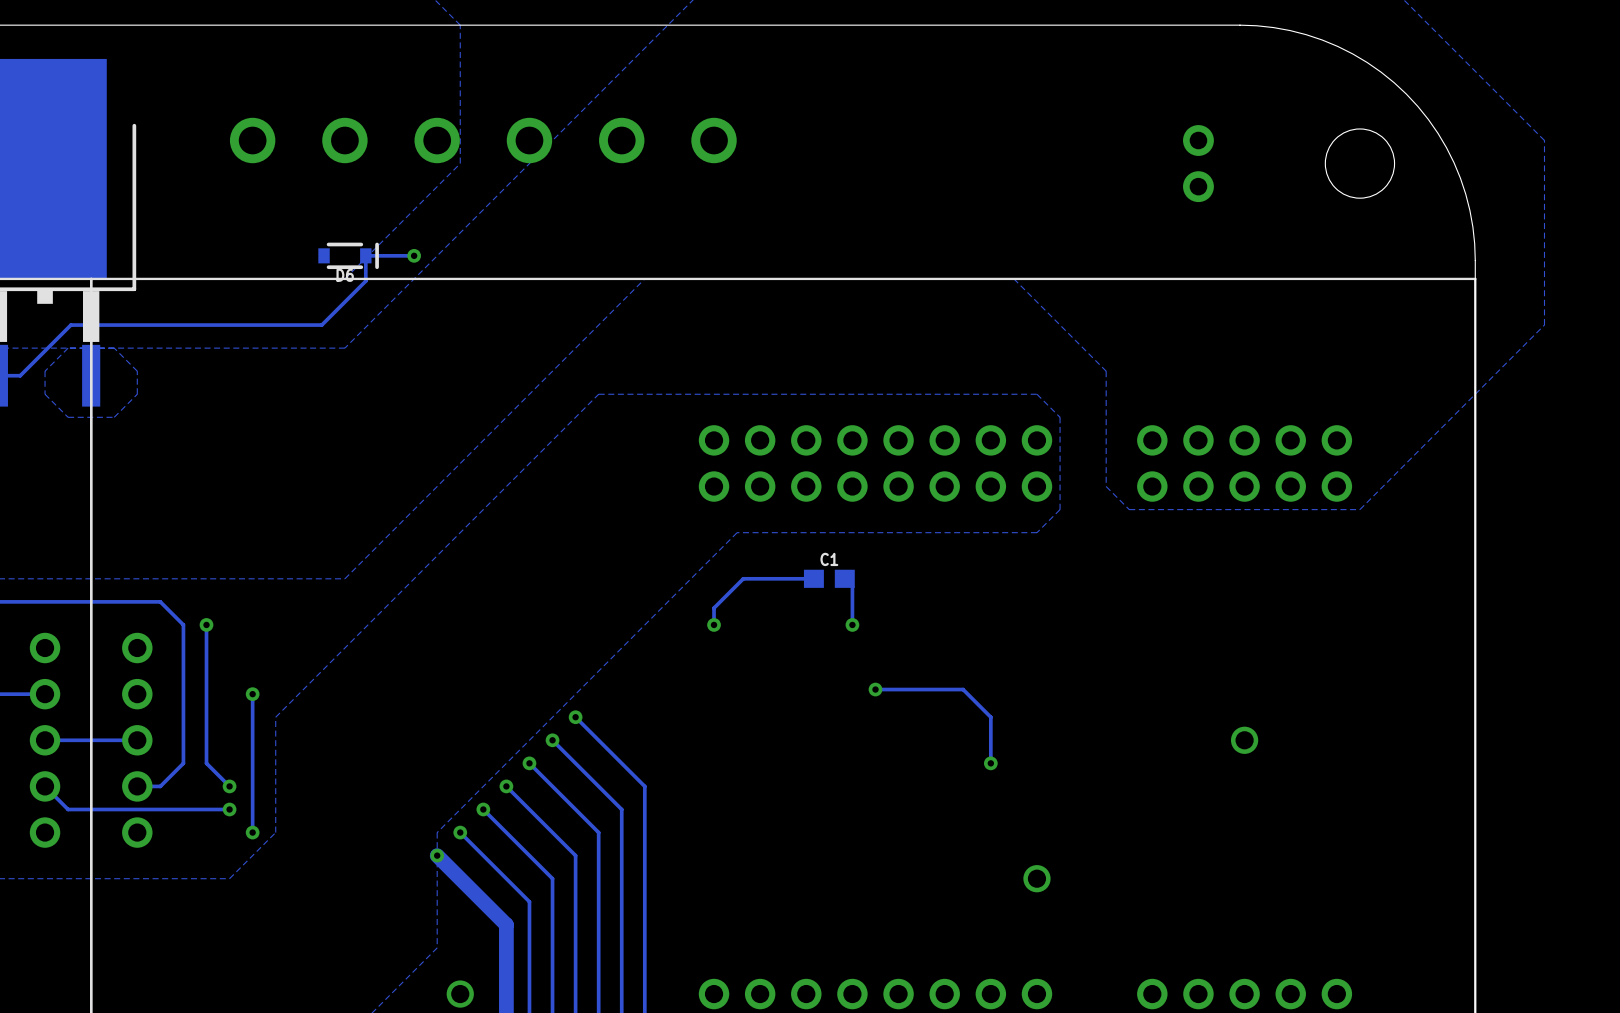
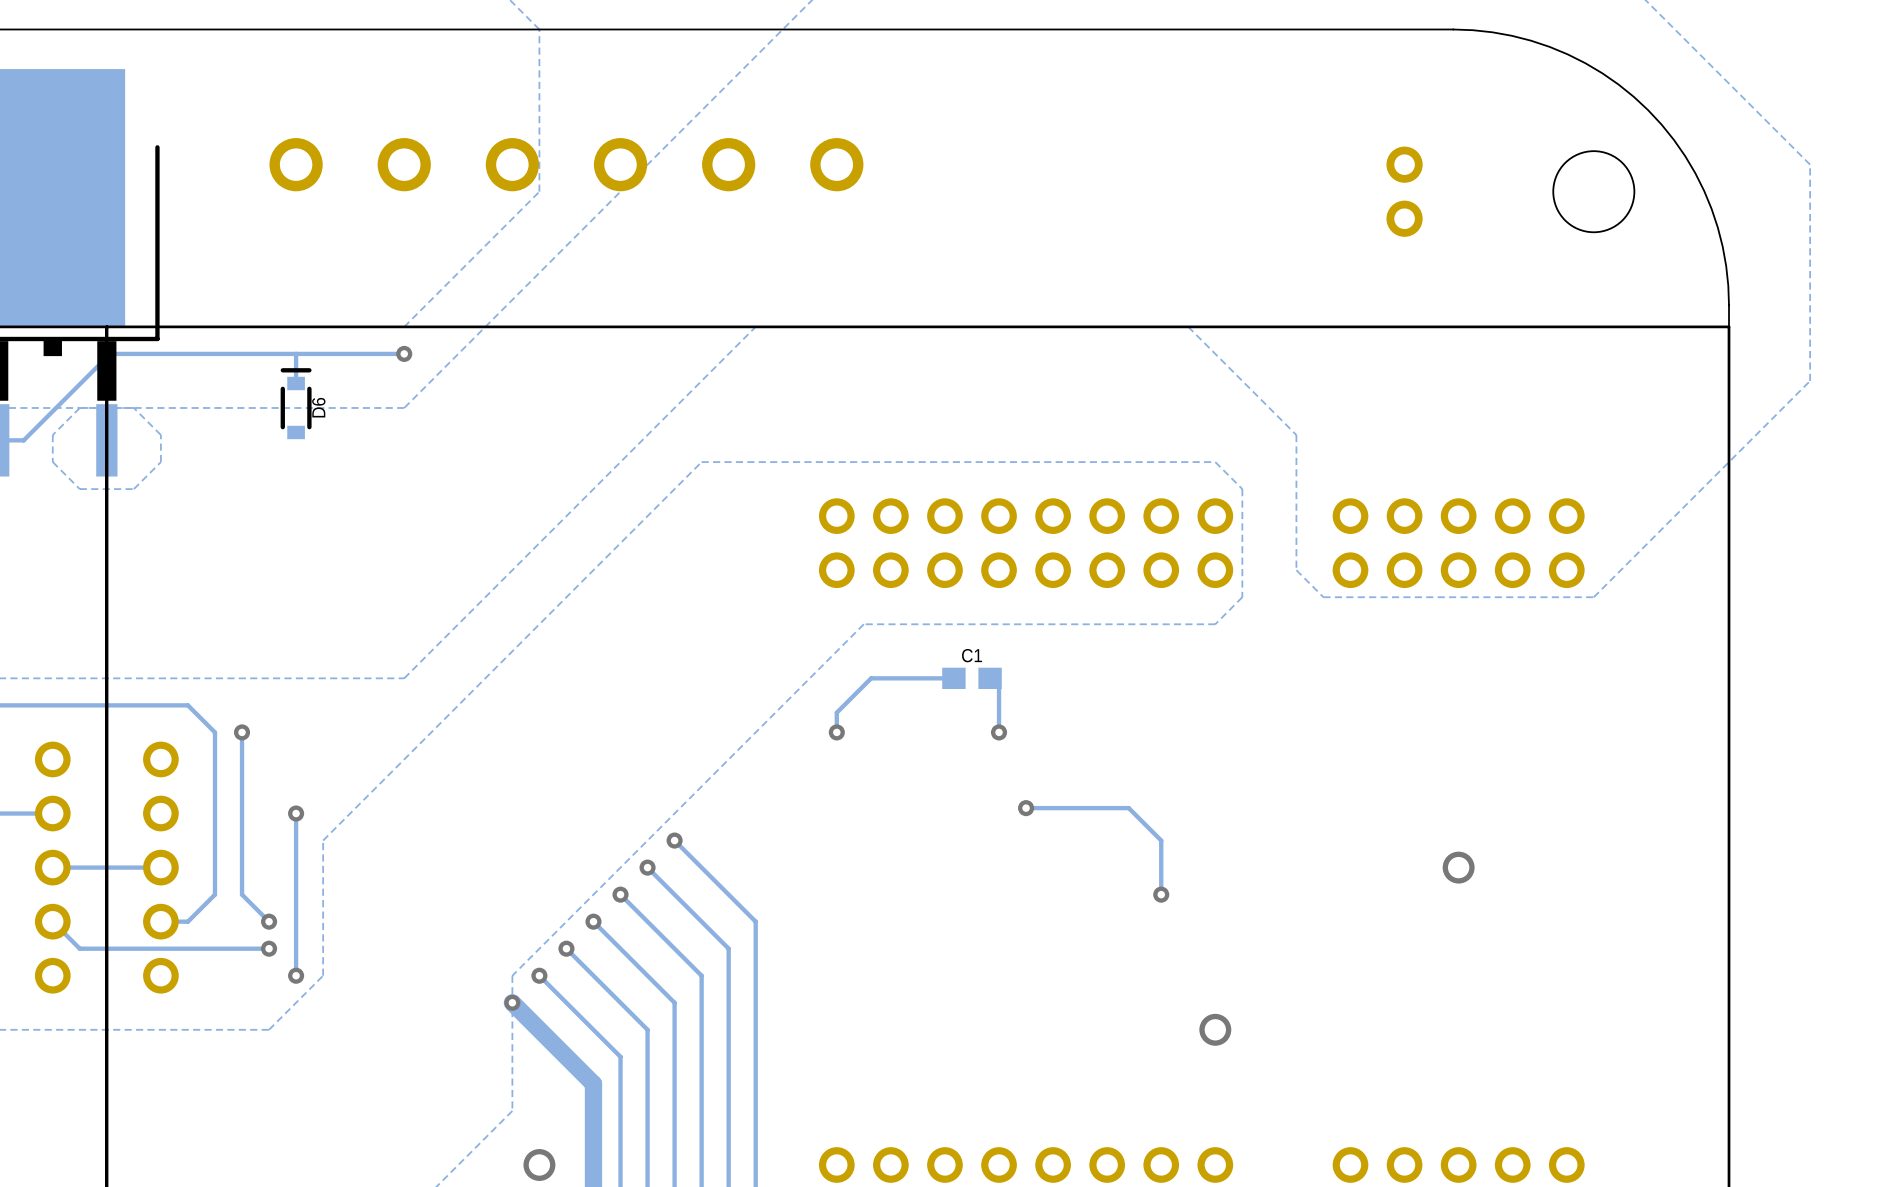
D6 rotation: 0° (348, 255) -> 90° counterclockwise (296, 403)
D6 position: (348, 255) -> (296, 403)
track: (414, 255) (365, 255) (365, 281) (321, 325) (70, 325) -> (404, 353) (110, 353) (83, 380)
via position: (414, 255) -> (404, 353)
track: none -> (296, 353) (296, 383)

